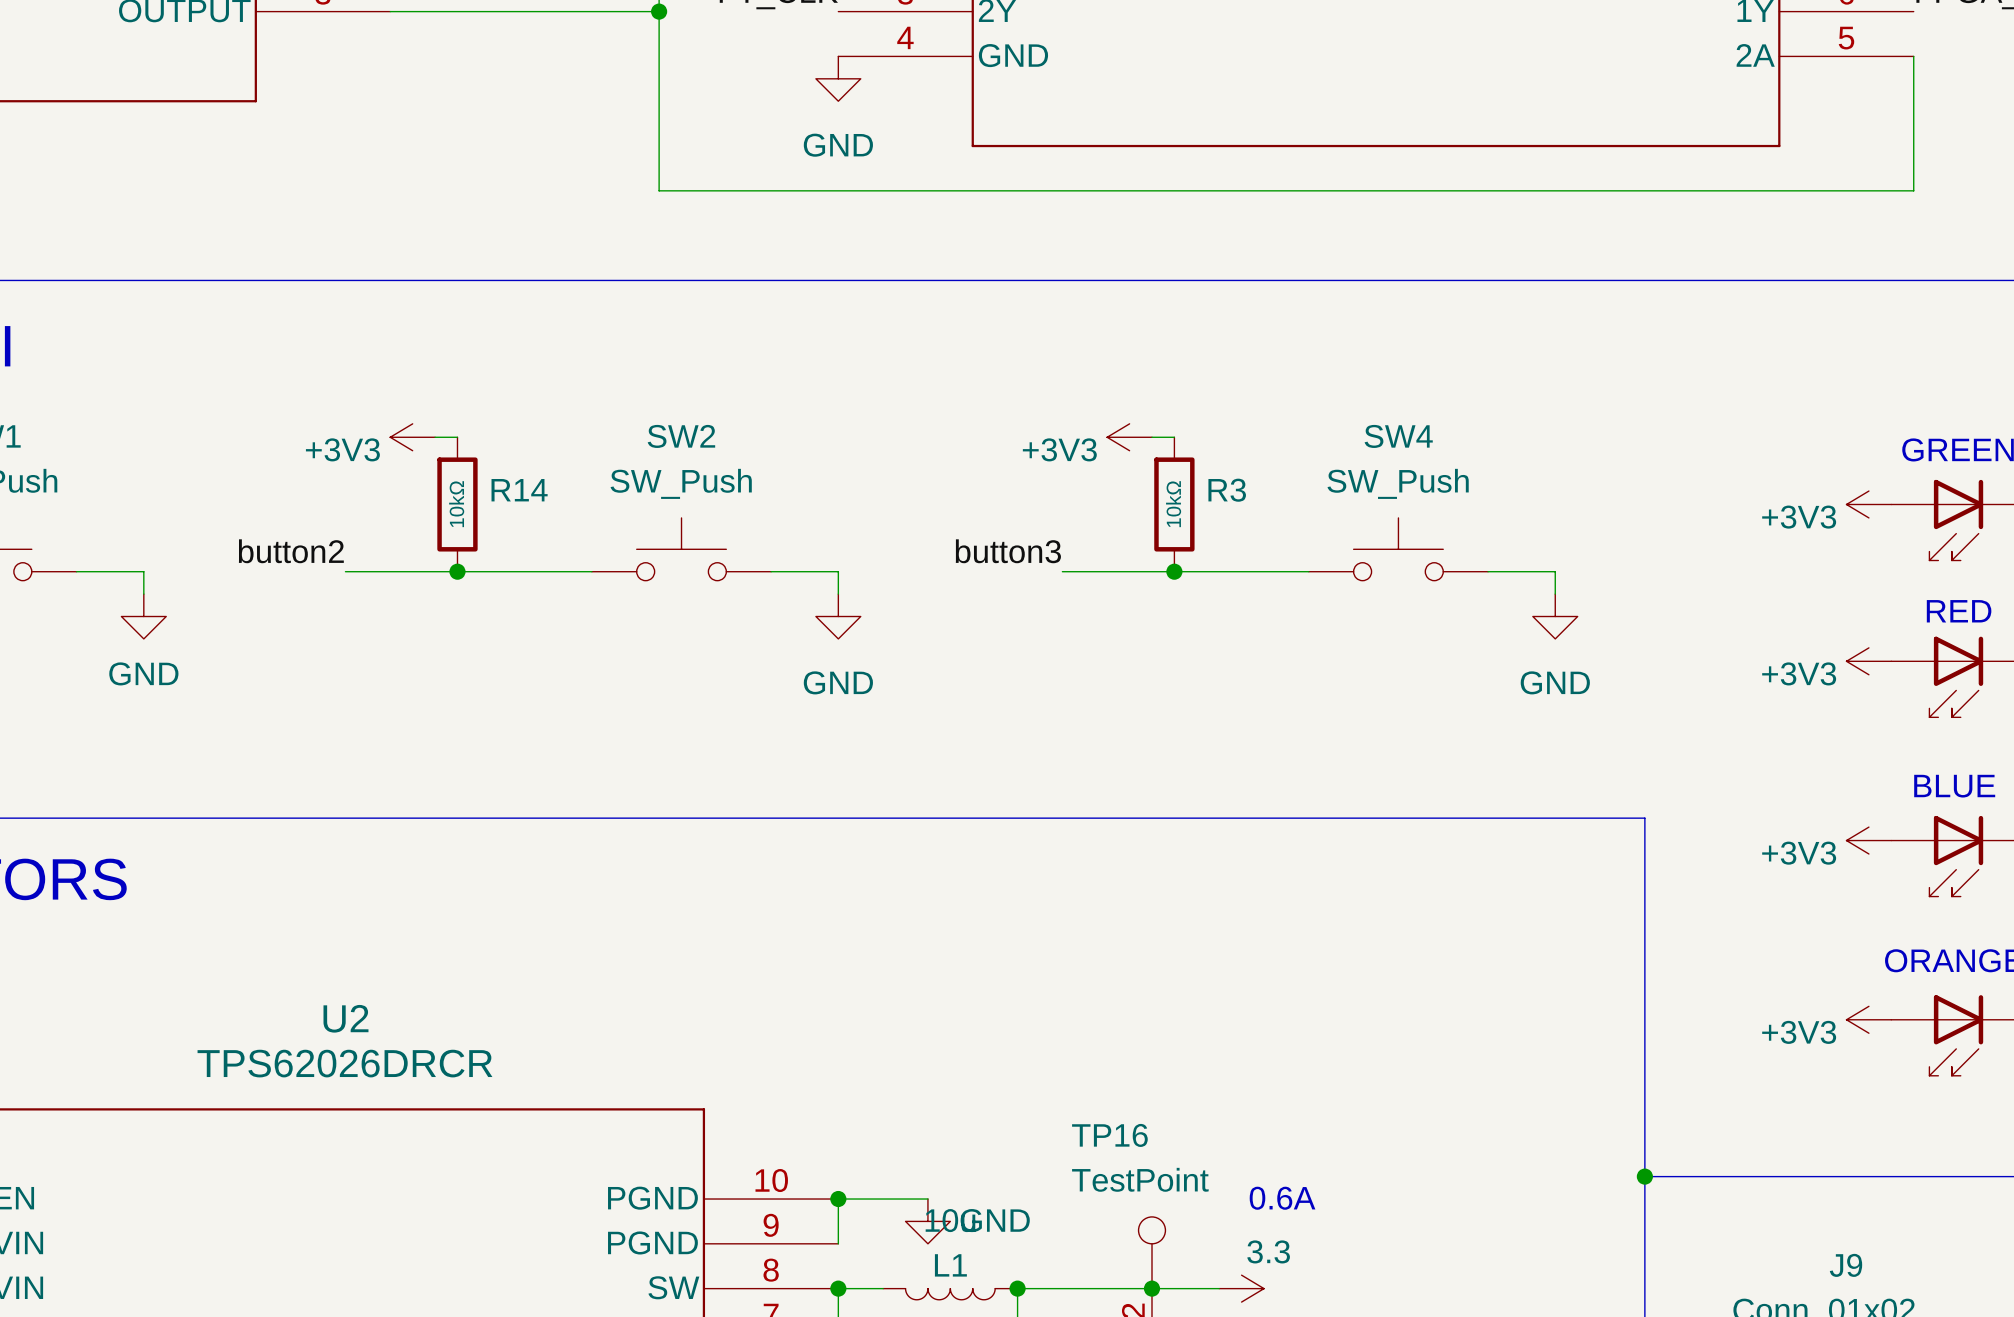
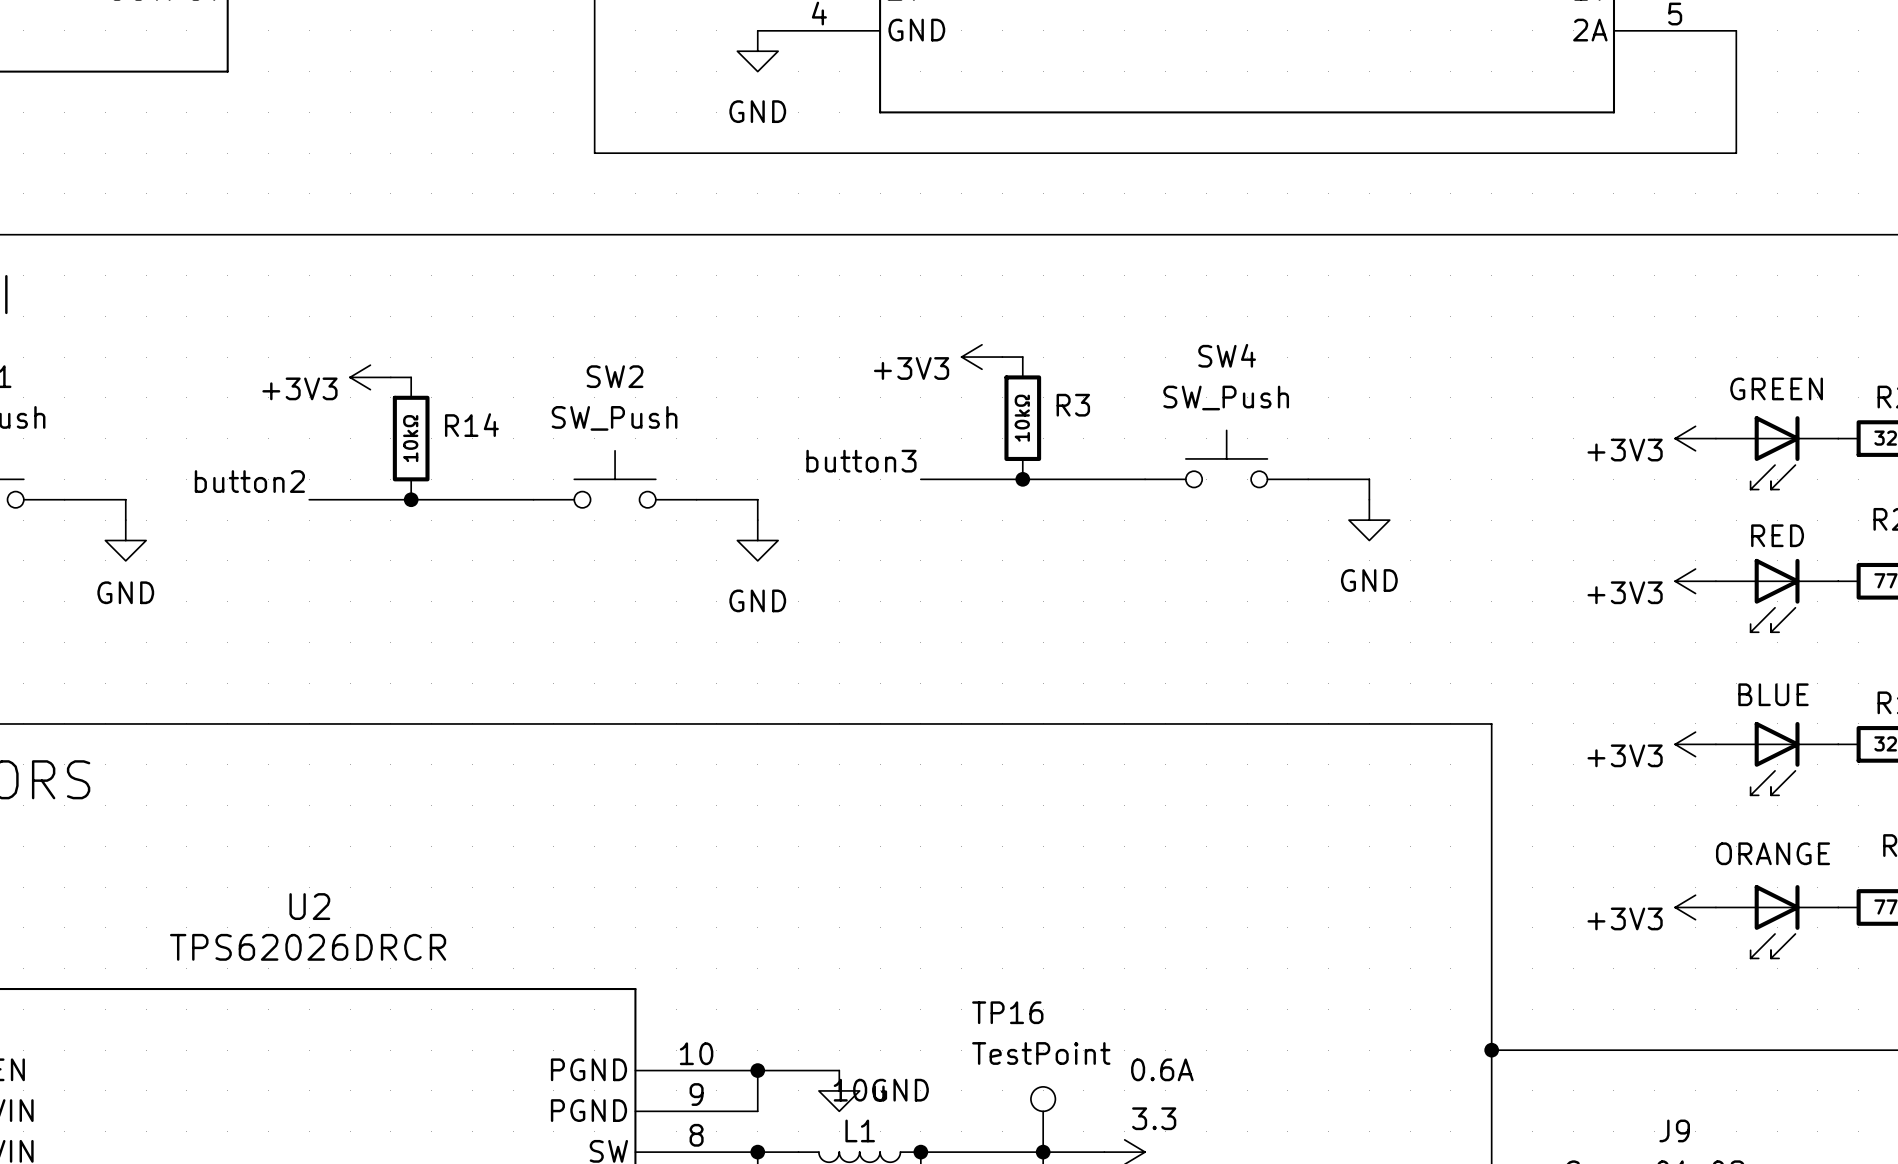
power symbol position: +3V3 (1129, 437) -> +3V3 (982, 357)
wire: (1151, 437) (1174, 437) -> (1002, 357) (1022, 357)
R3 position: (1174, 504) -> (1022, 418)
SW4 position: (1398, 549) -> (1226, 458)
label position: button3 (1008, 551) -> button3 (861, 461)
wire: (1062, 571) (1308, 571) -> (920, 479) (1145, 479)
junction position: (1174, 571) -> (1022, 479)
wire: (1488, 571) (1555, 571) (1555, 594) -> (1308, 479) (1369, 479) (1369, 499)
power symbol position: GND (1555, 616) -> GND (1369, 520)

